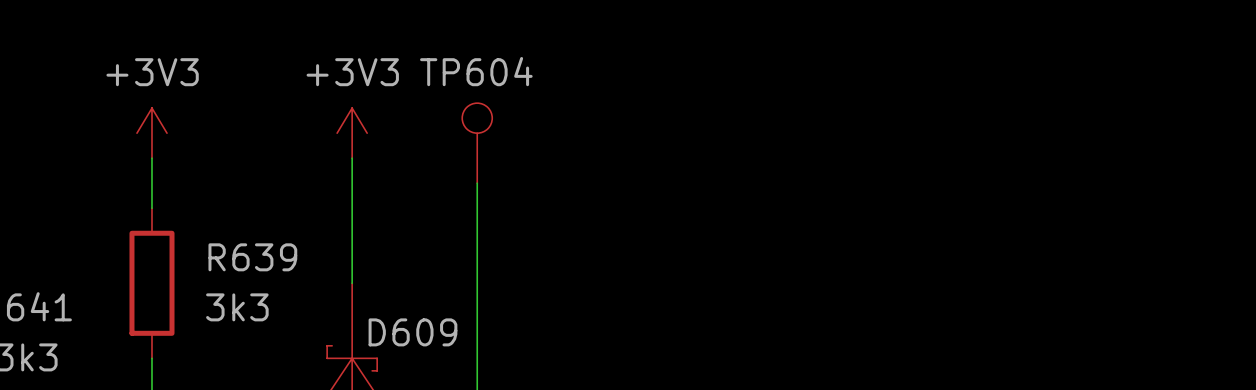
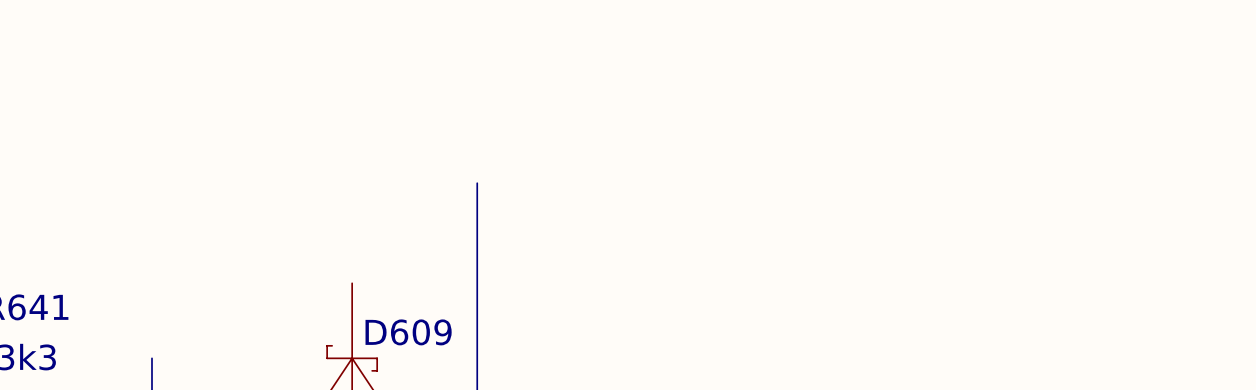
power symbol: +3V3 (151, 133) -> none
power symbol: +3V3 (352, 133) -> none
TP604: (477, 143) -> none
wire: (151, 158) (151, 208) -> none
wire: (352, 158) (352, 283) -> none
R639: 3k3 (151, 283) -> none

